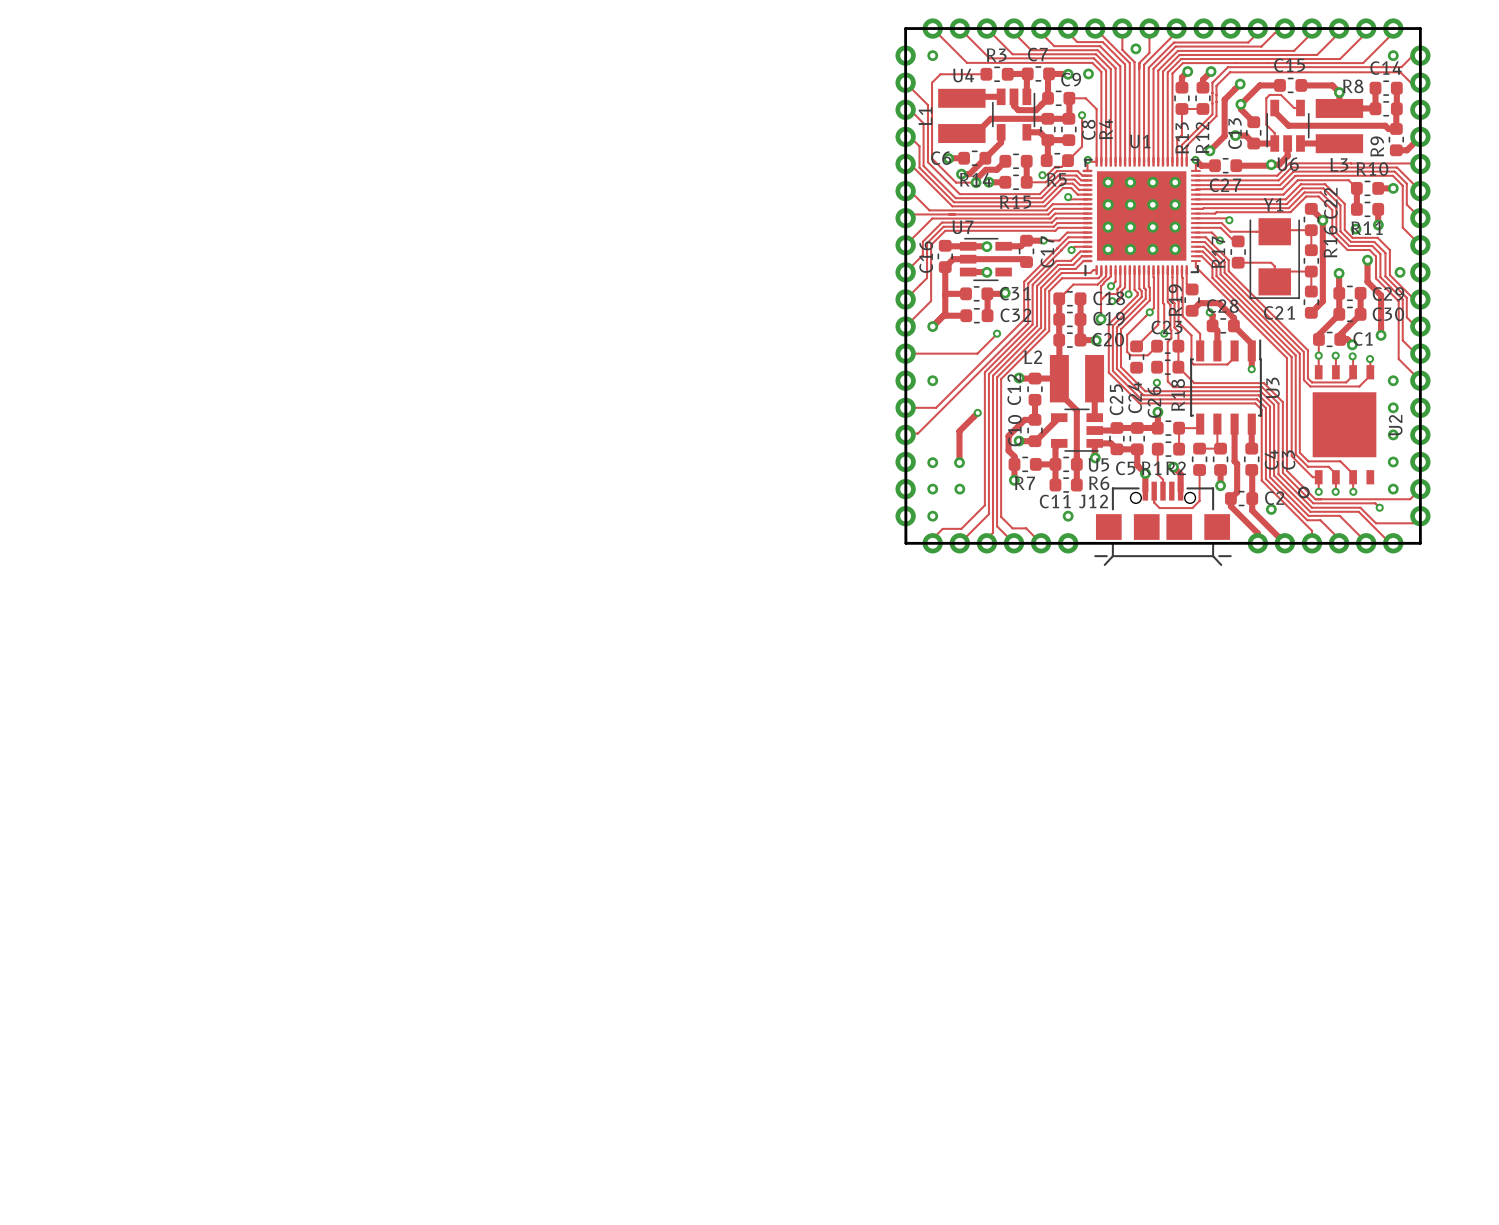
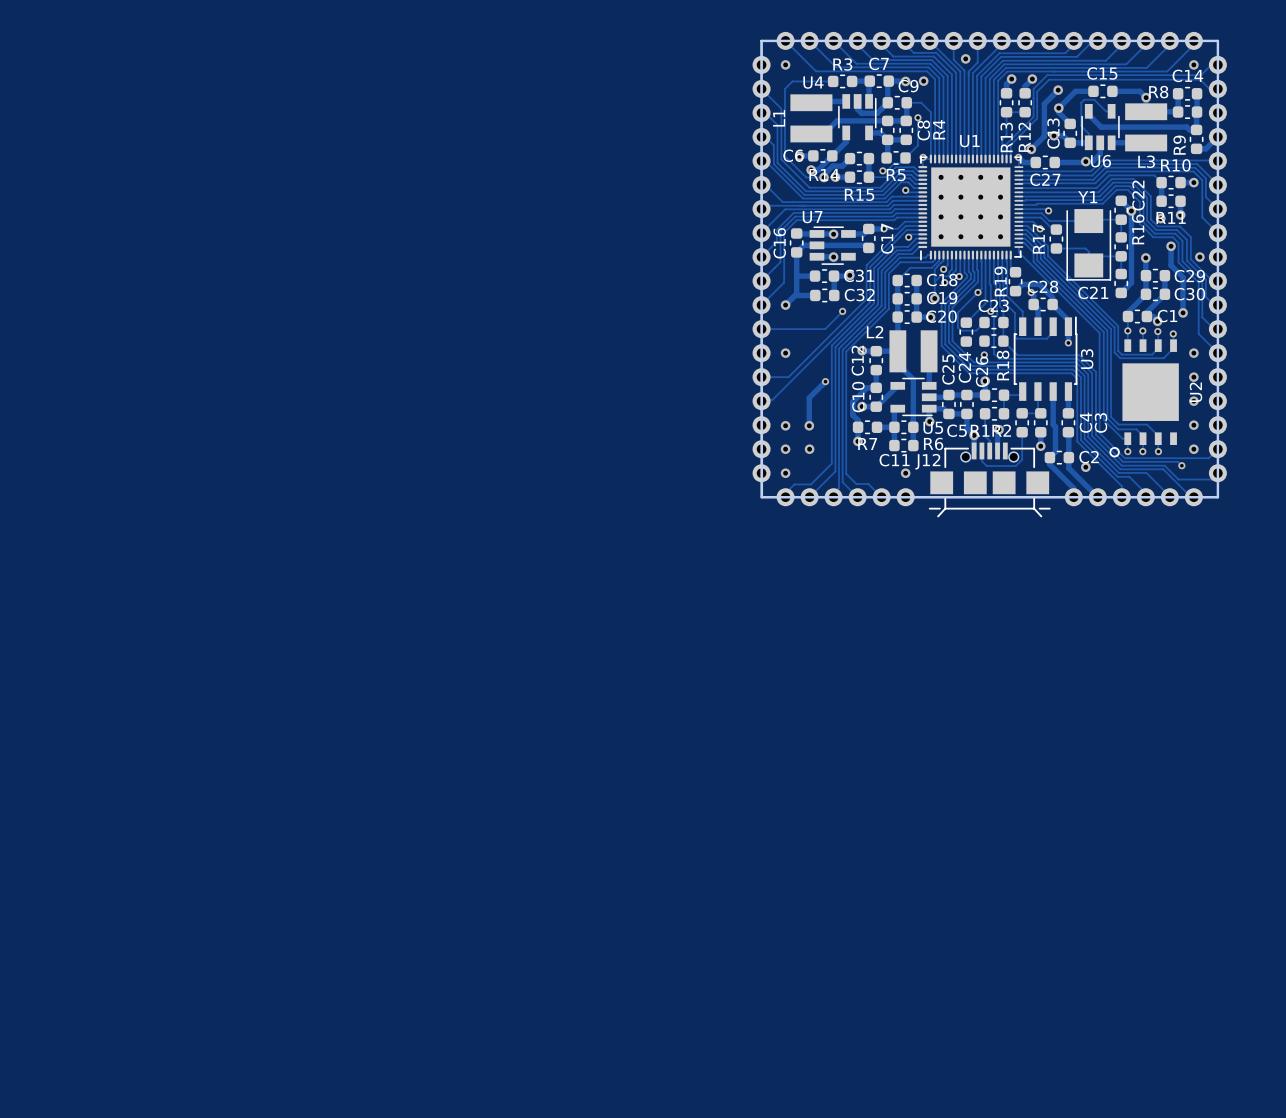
track: (1173, 467) (1180, 474) (1180, 491) -> none
track: none -> (997, 435) (997, 451)

